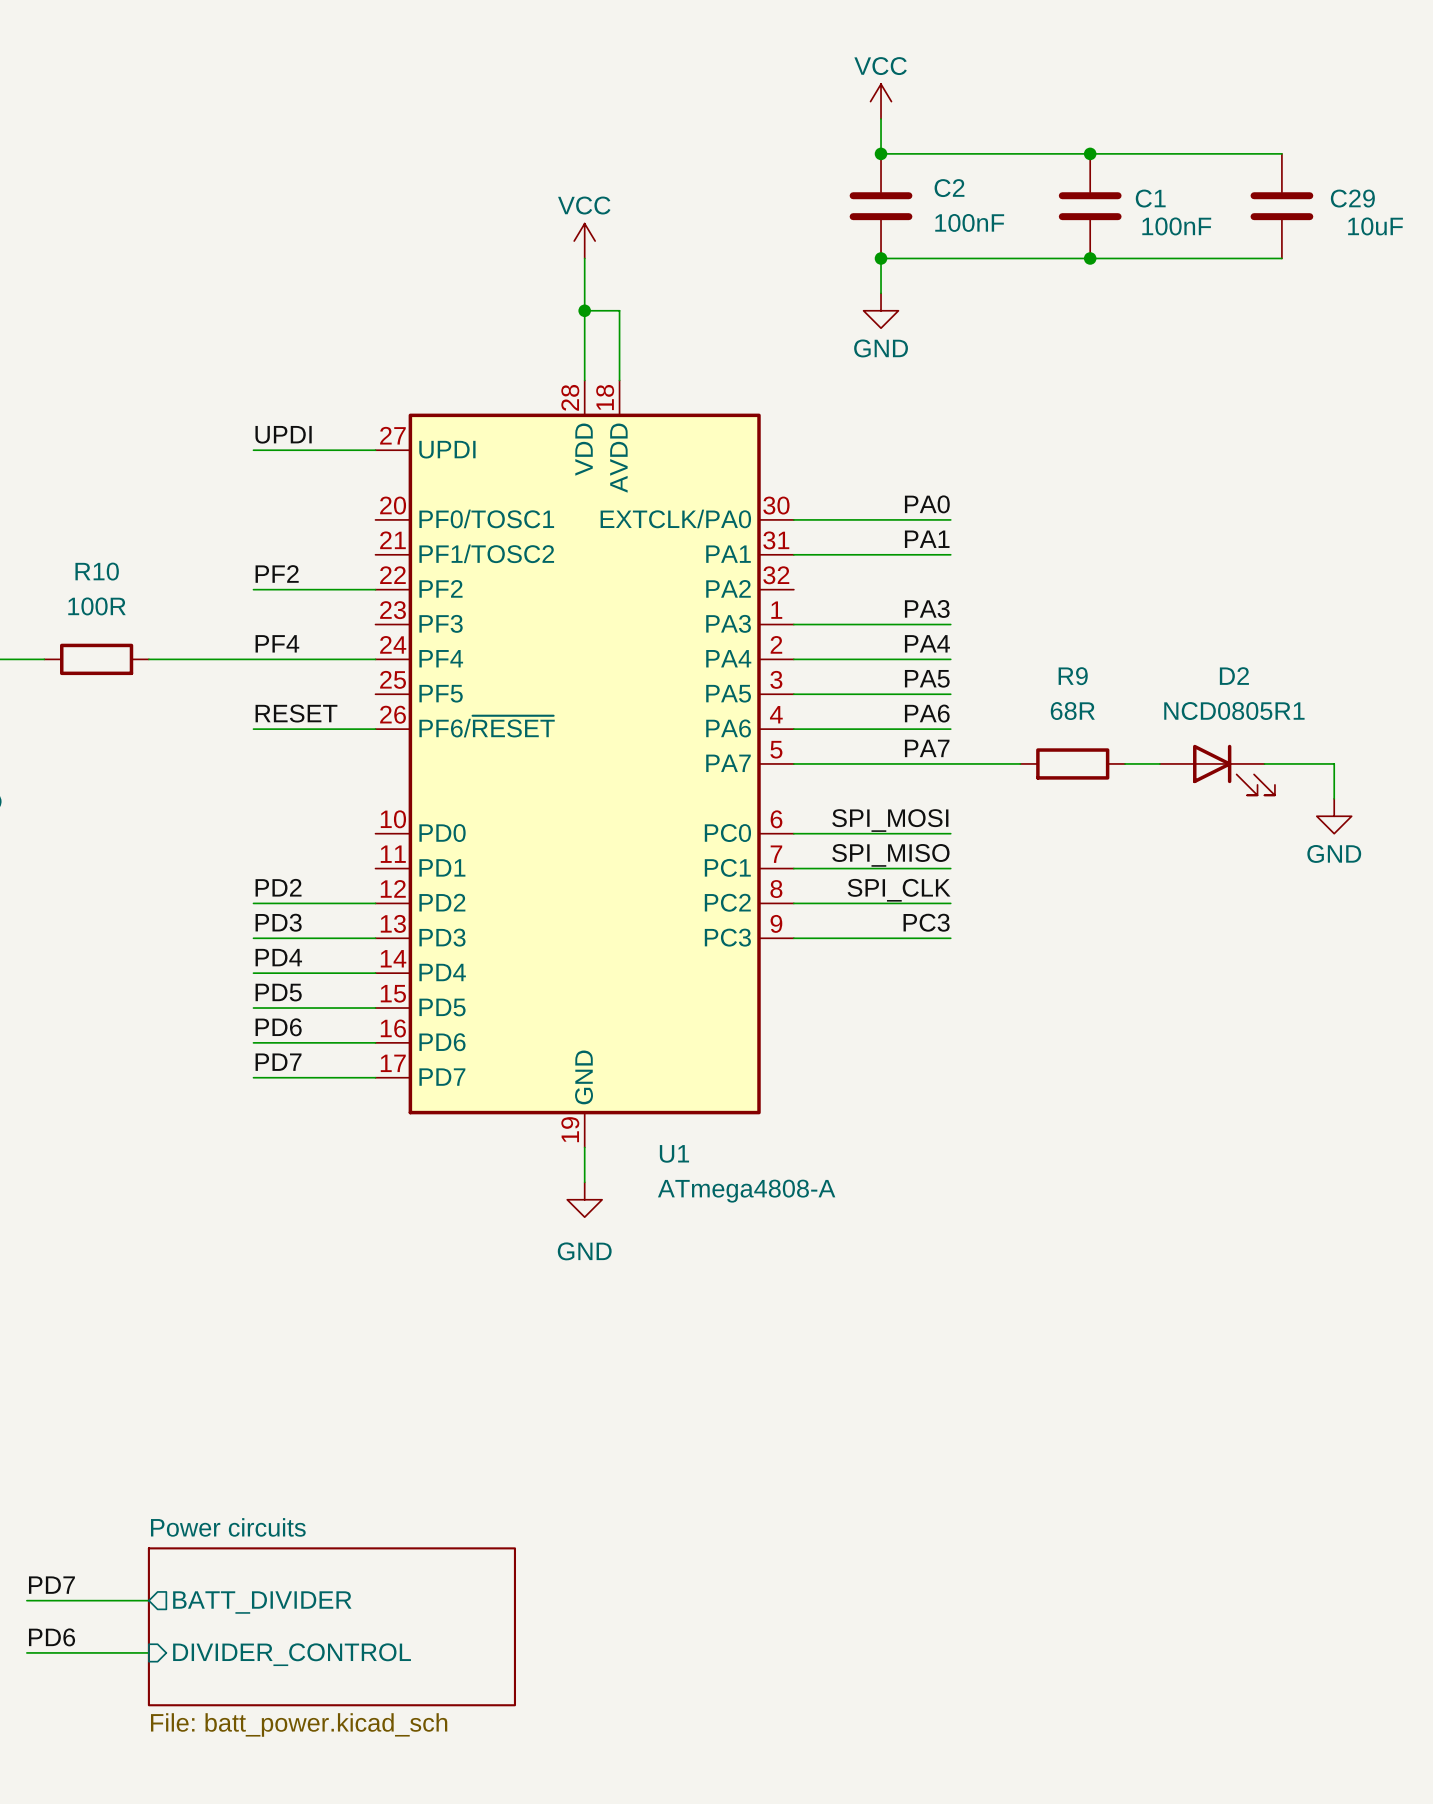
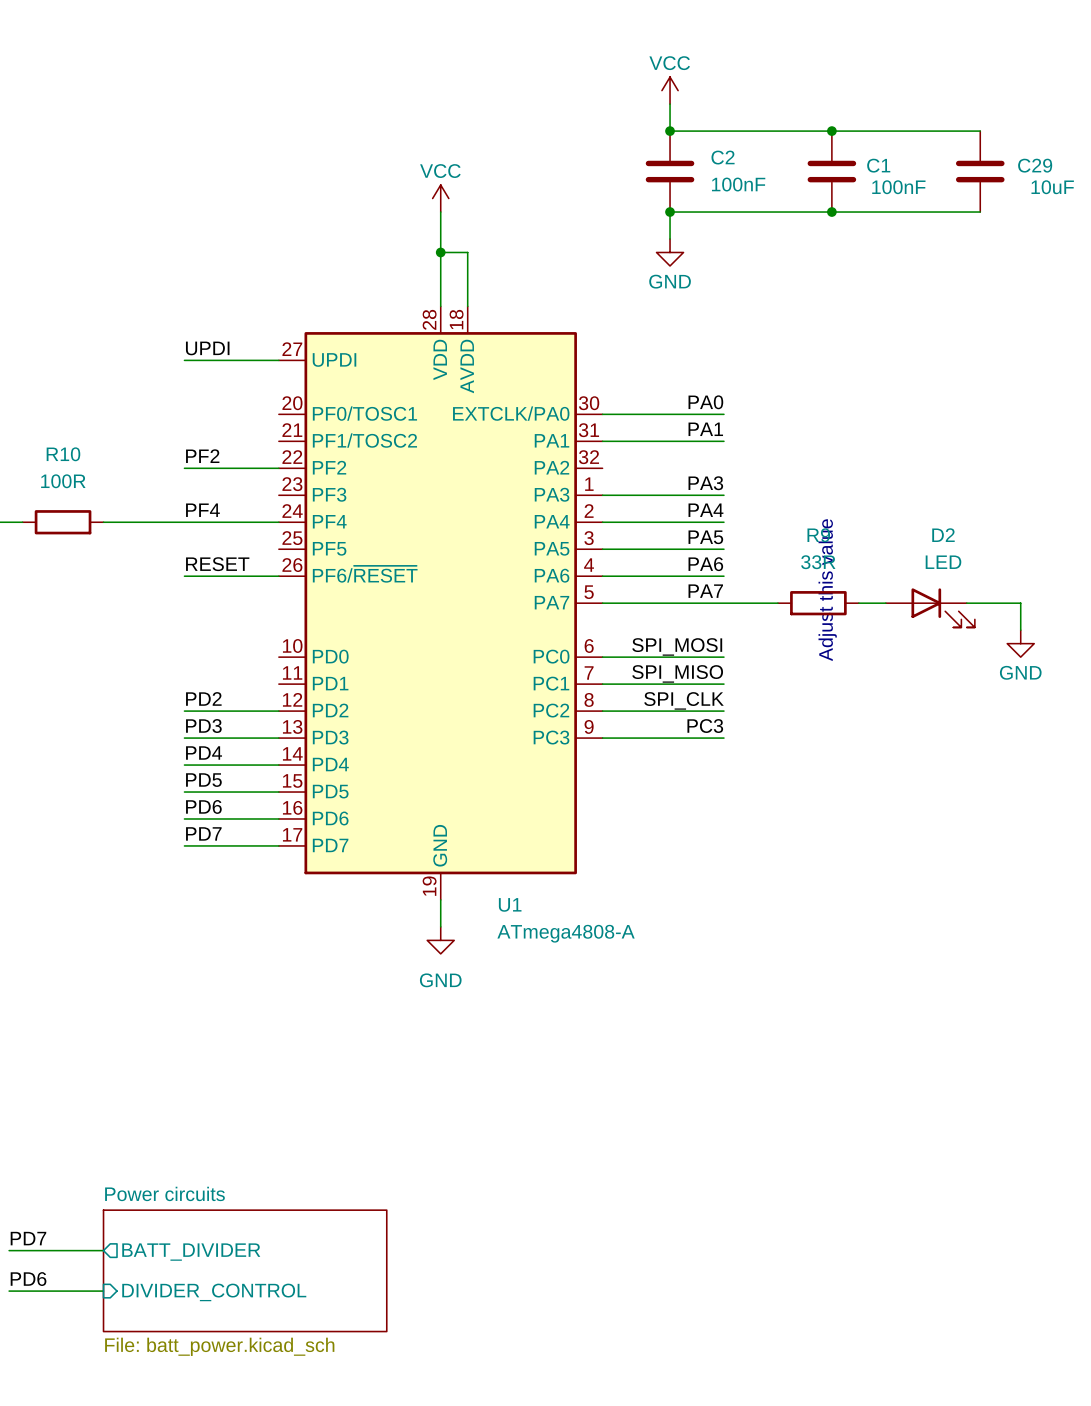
R9 value: 68R (1072, 711) -> 33R (818, 562)
D2 value: NCD0805R1 (1234, 711) -> LED (943, 562)
text: none -> Adjust this value (827, 590)

